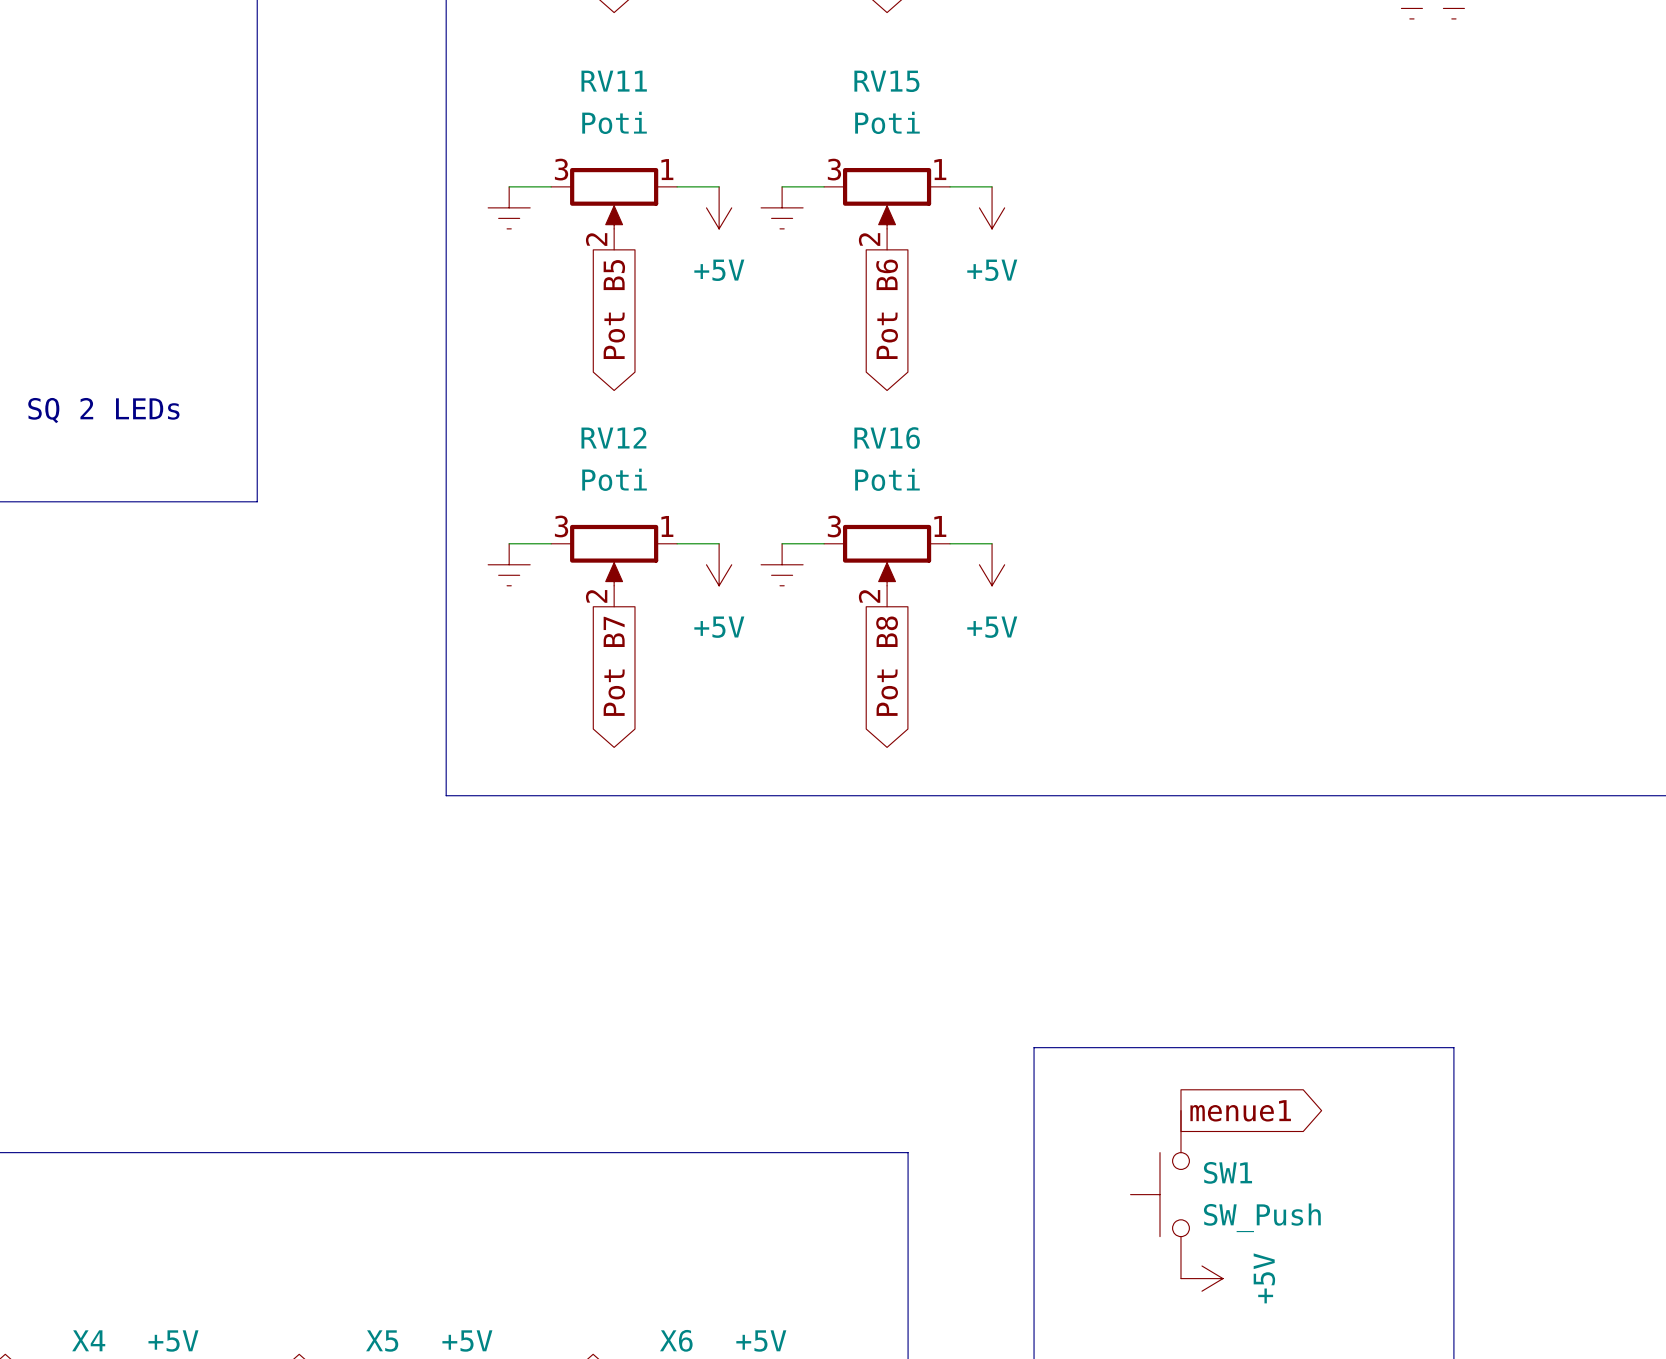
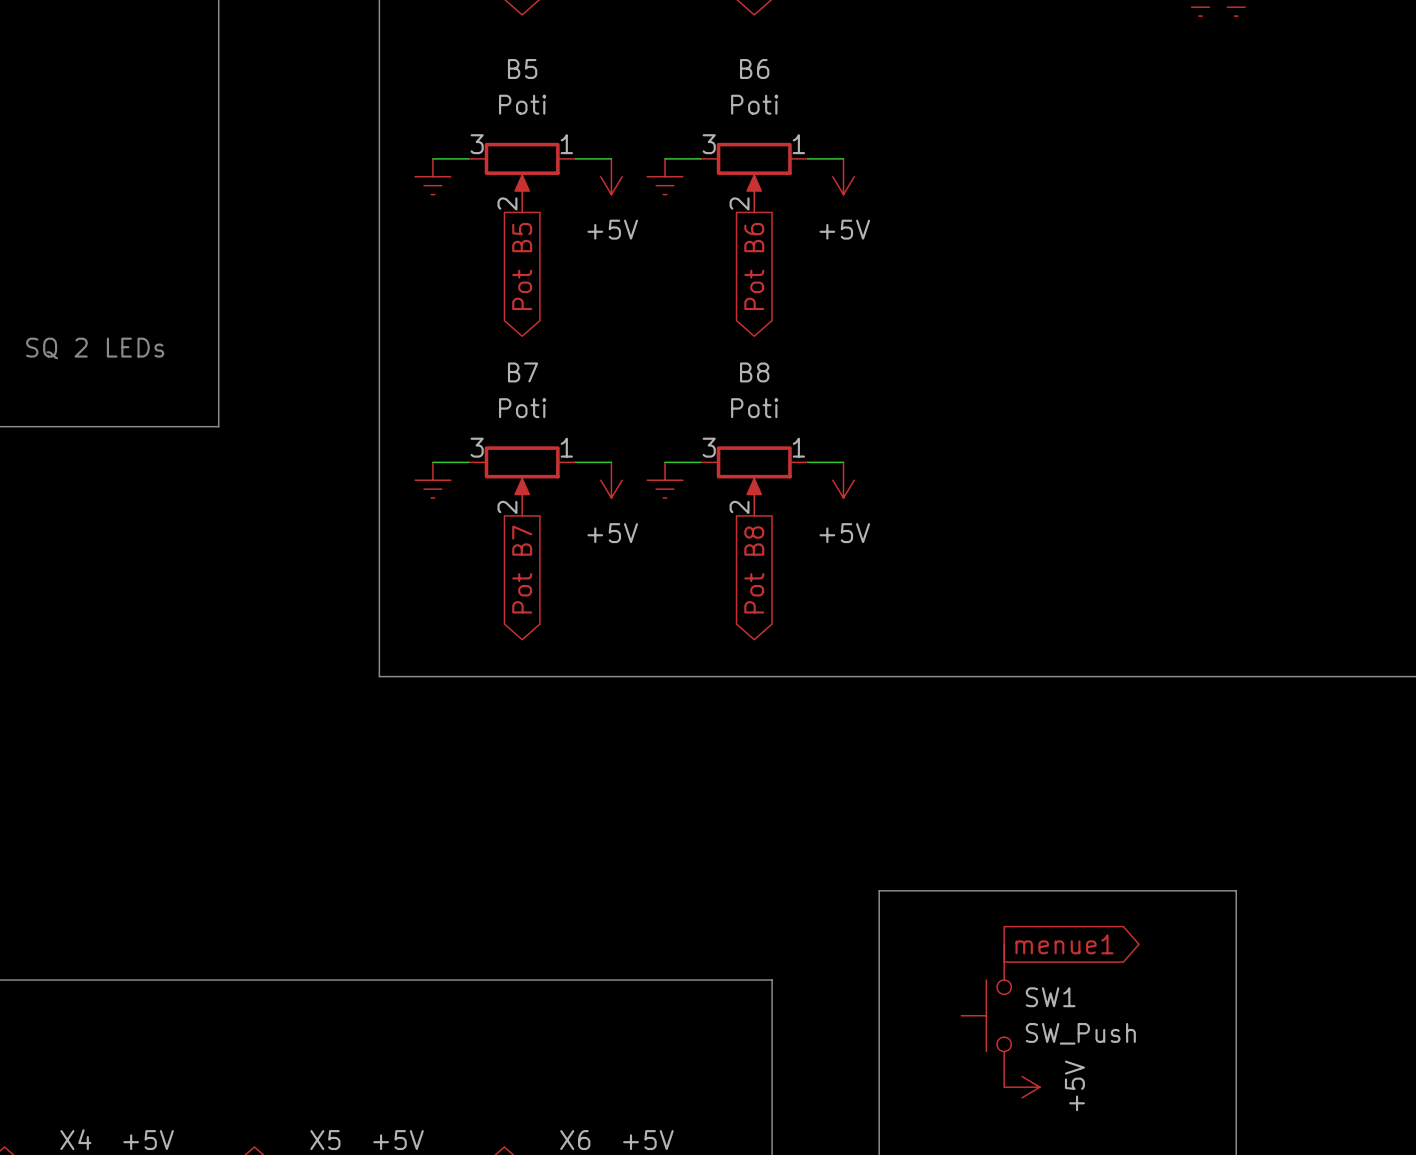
RV11 name: RV11 (614, 81) -> B5 (522, 68)
RV15 name: RV15 (886, 81) -> B6 (754, 68)
RV12 name: RV12 (613, 437) -> B7 (523, 372)
RV16 name: RV16 (887, 438) -> B8 (754, 372)

